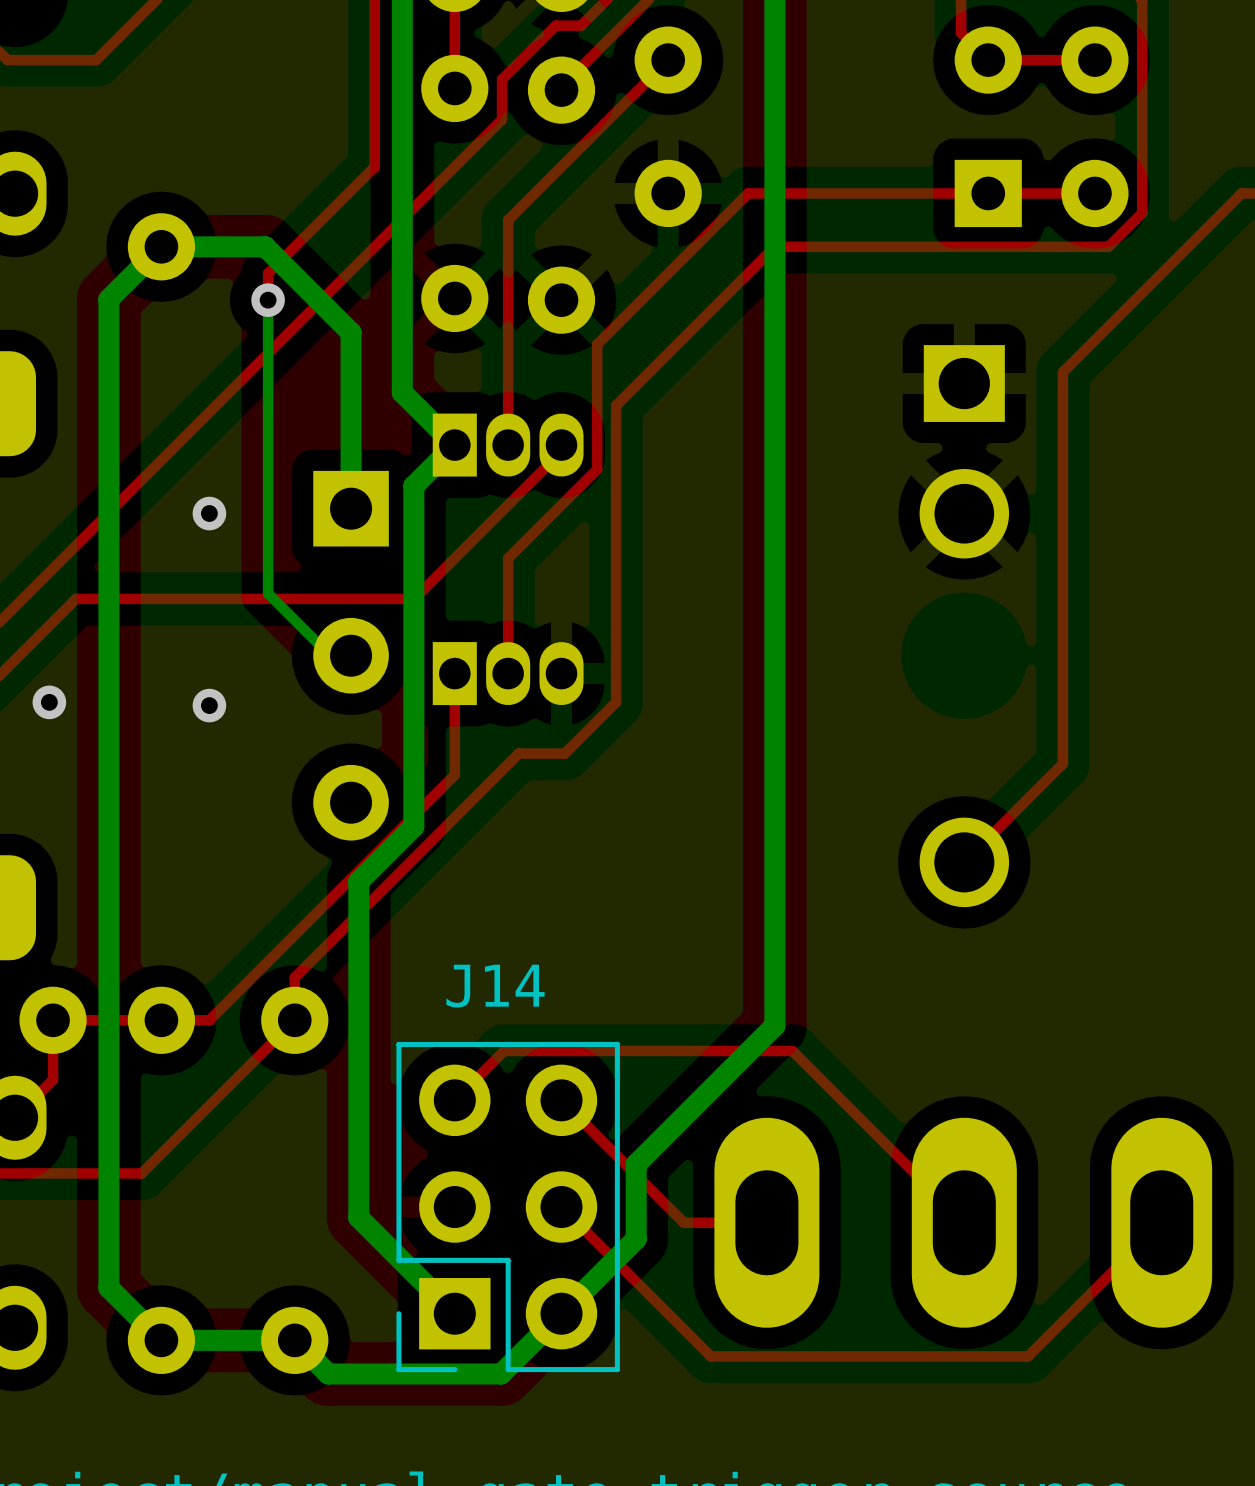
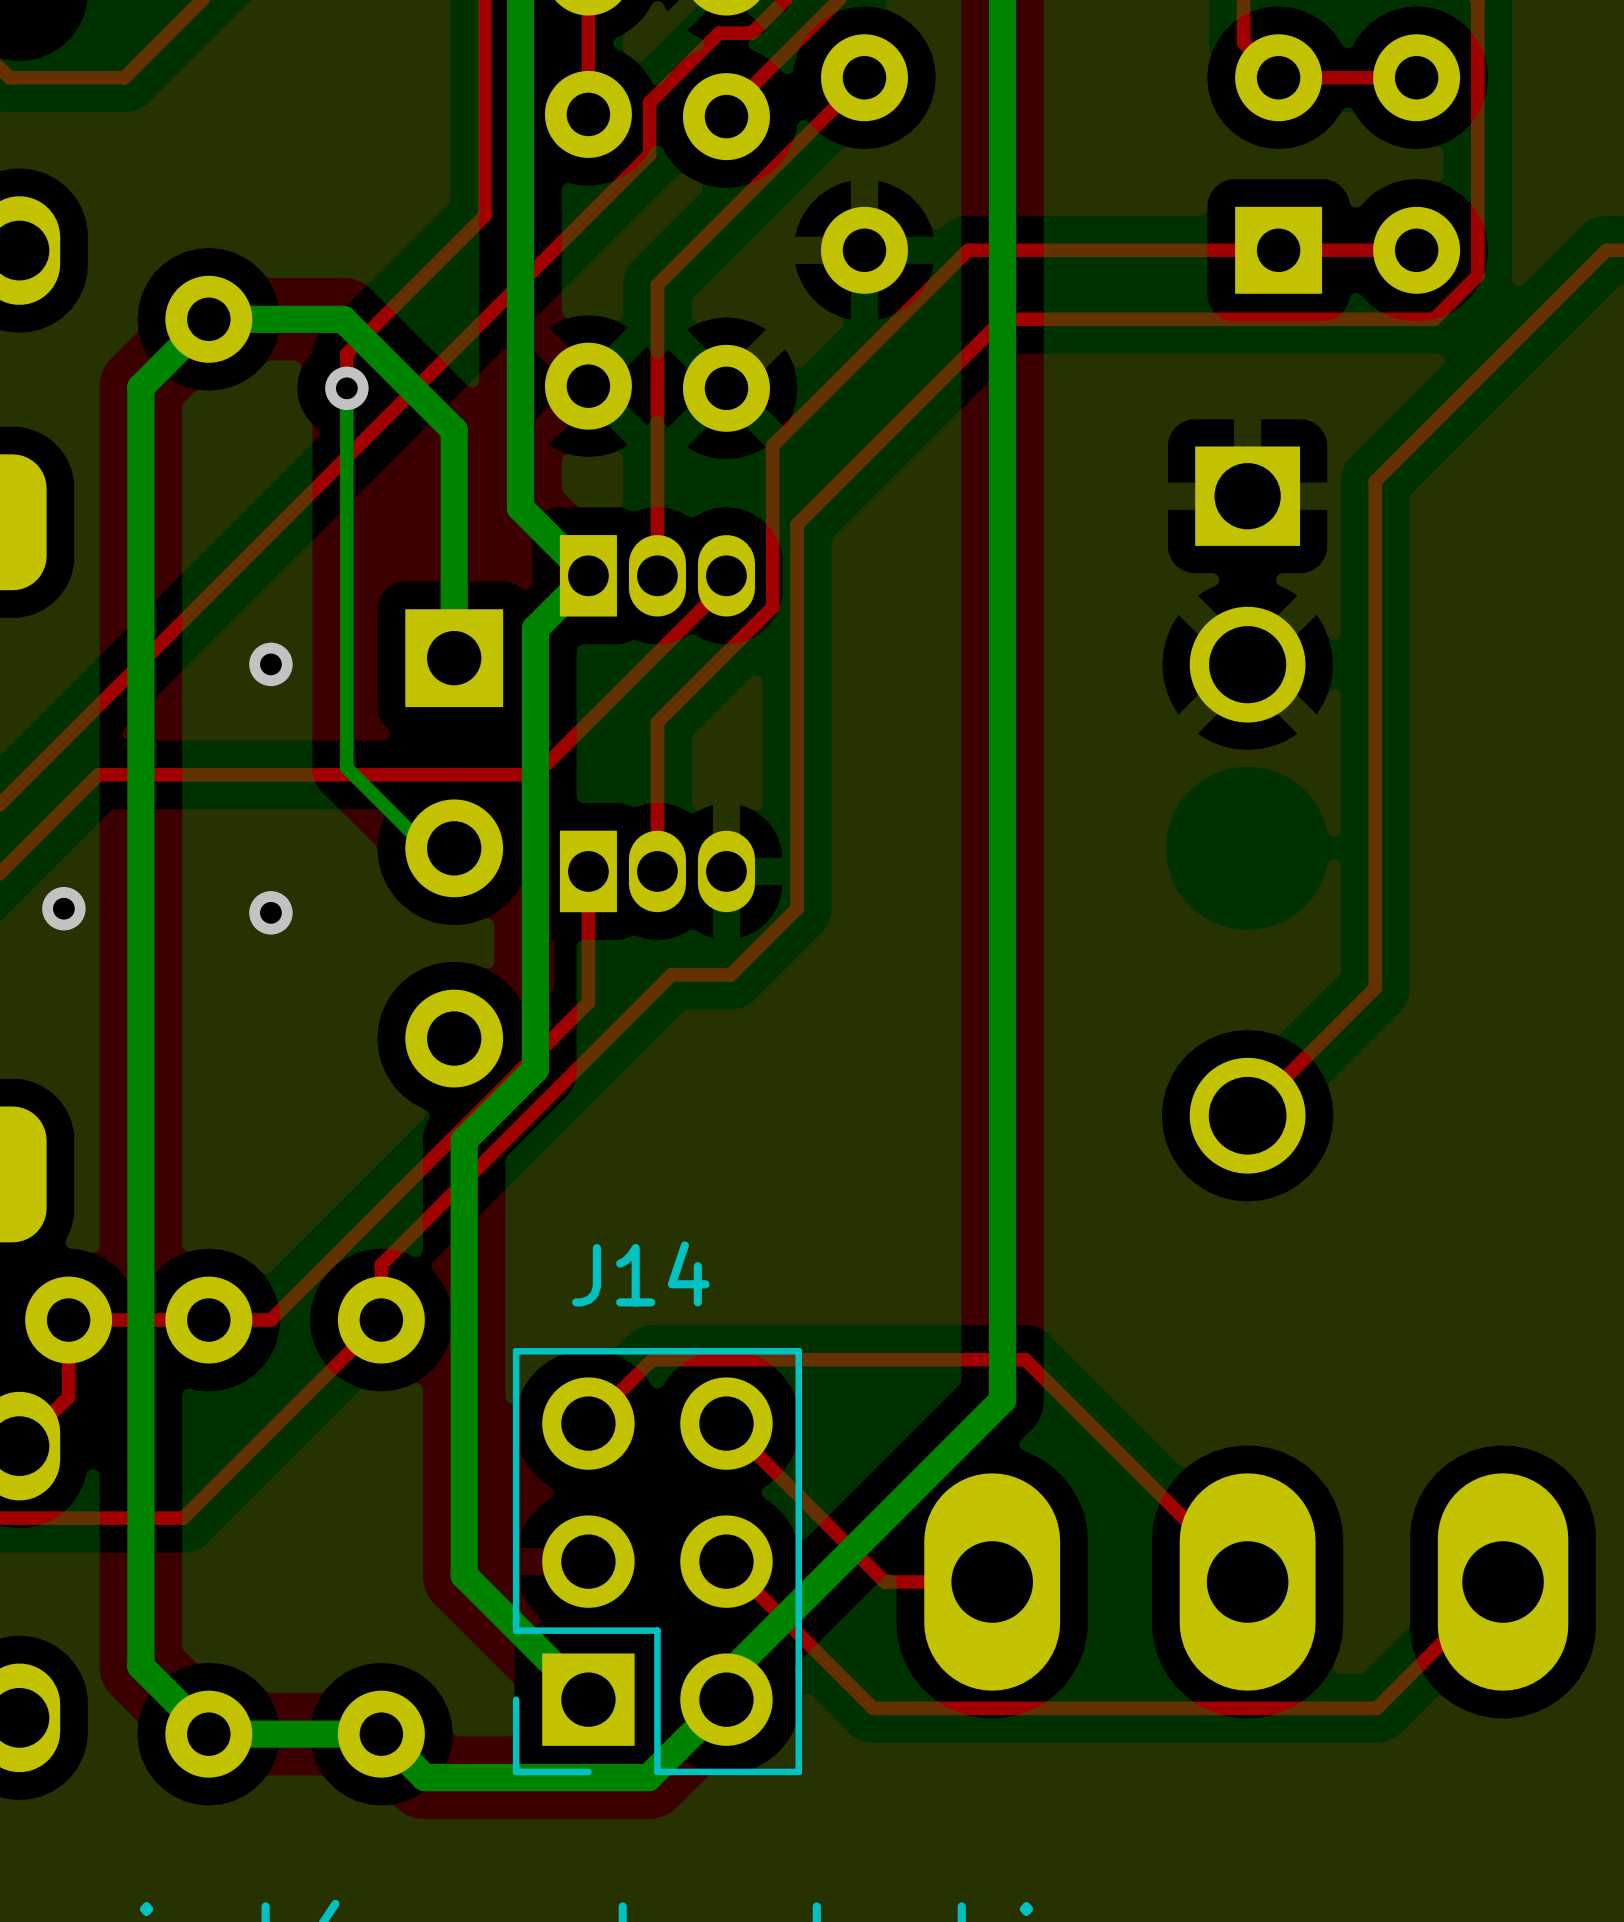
bottom track: (774, 1025) (636, 1164) (636, 1239) (561, 1313) -> (1002, 1326) (1002, 1400) (726, 1676) (726, 1699)
part footprint: [714, 1117, 1213, 1328] -> [924, 1473, 1569, 1691]
top track: (1064, 1320) (1028, 1356) (710, 1356) (674, 1320) -> (1376, 1708) (873, 1708)

